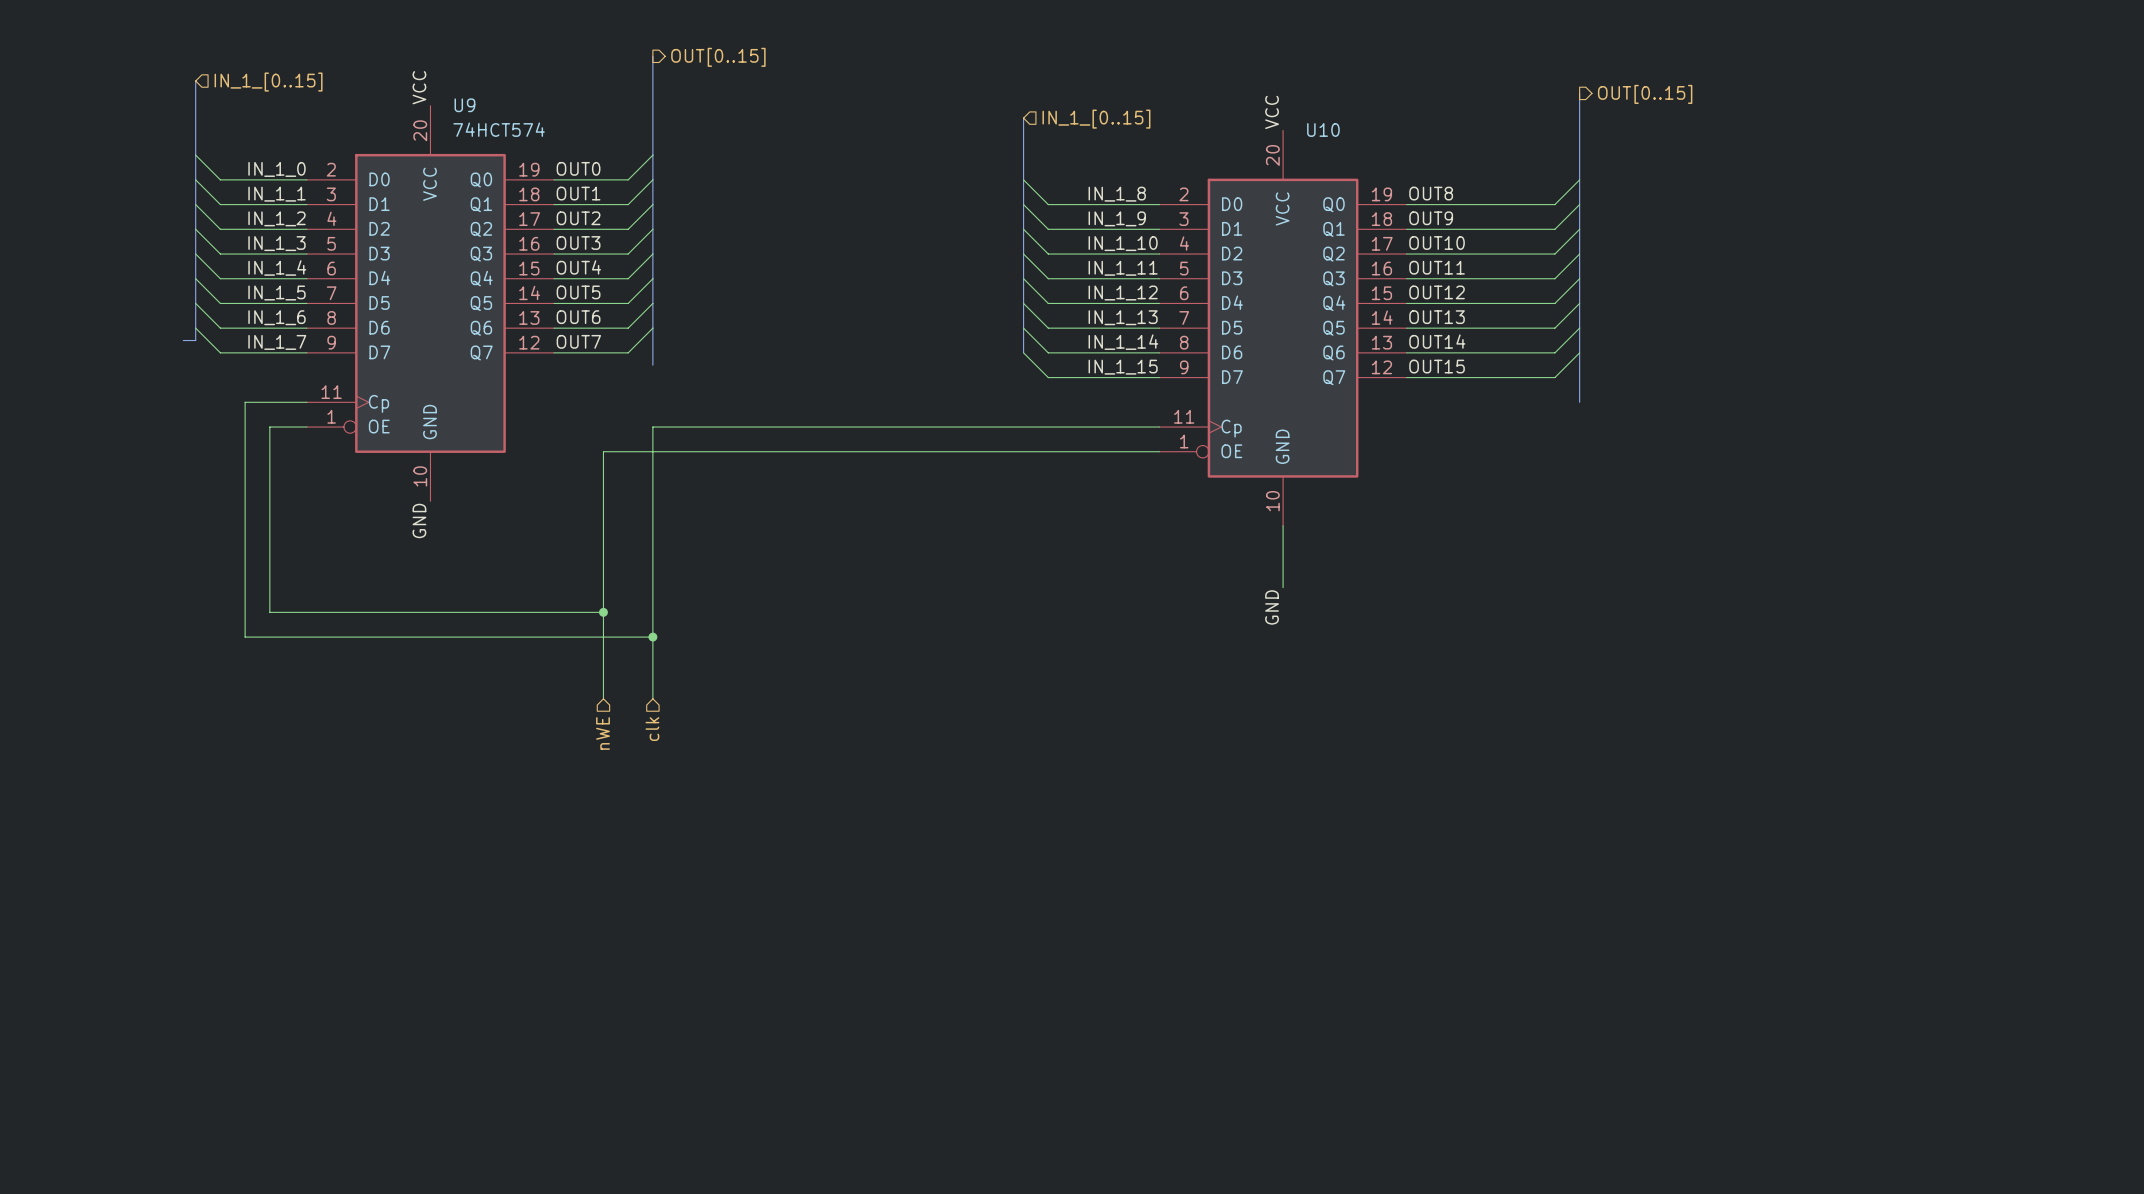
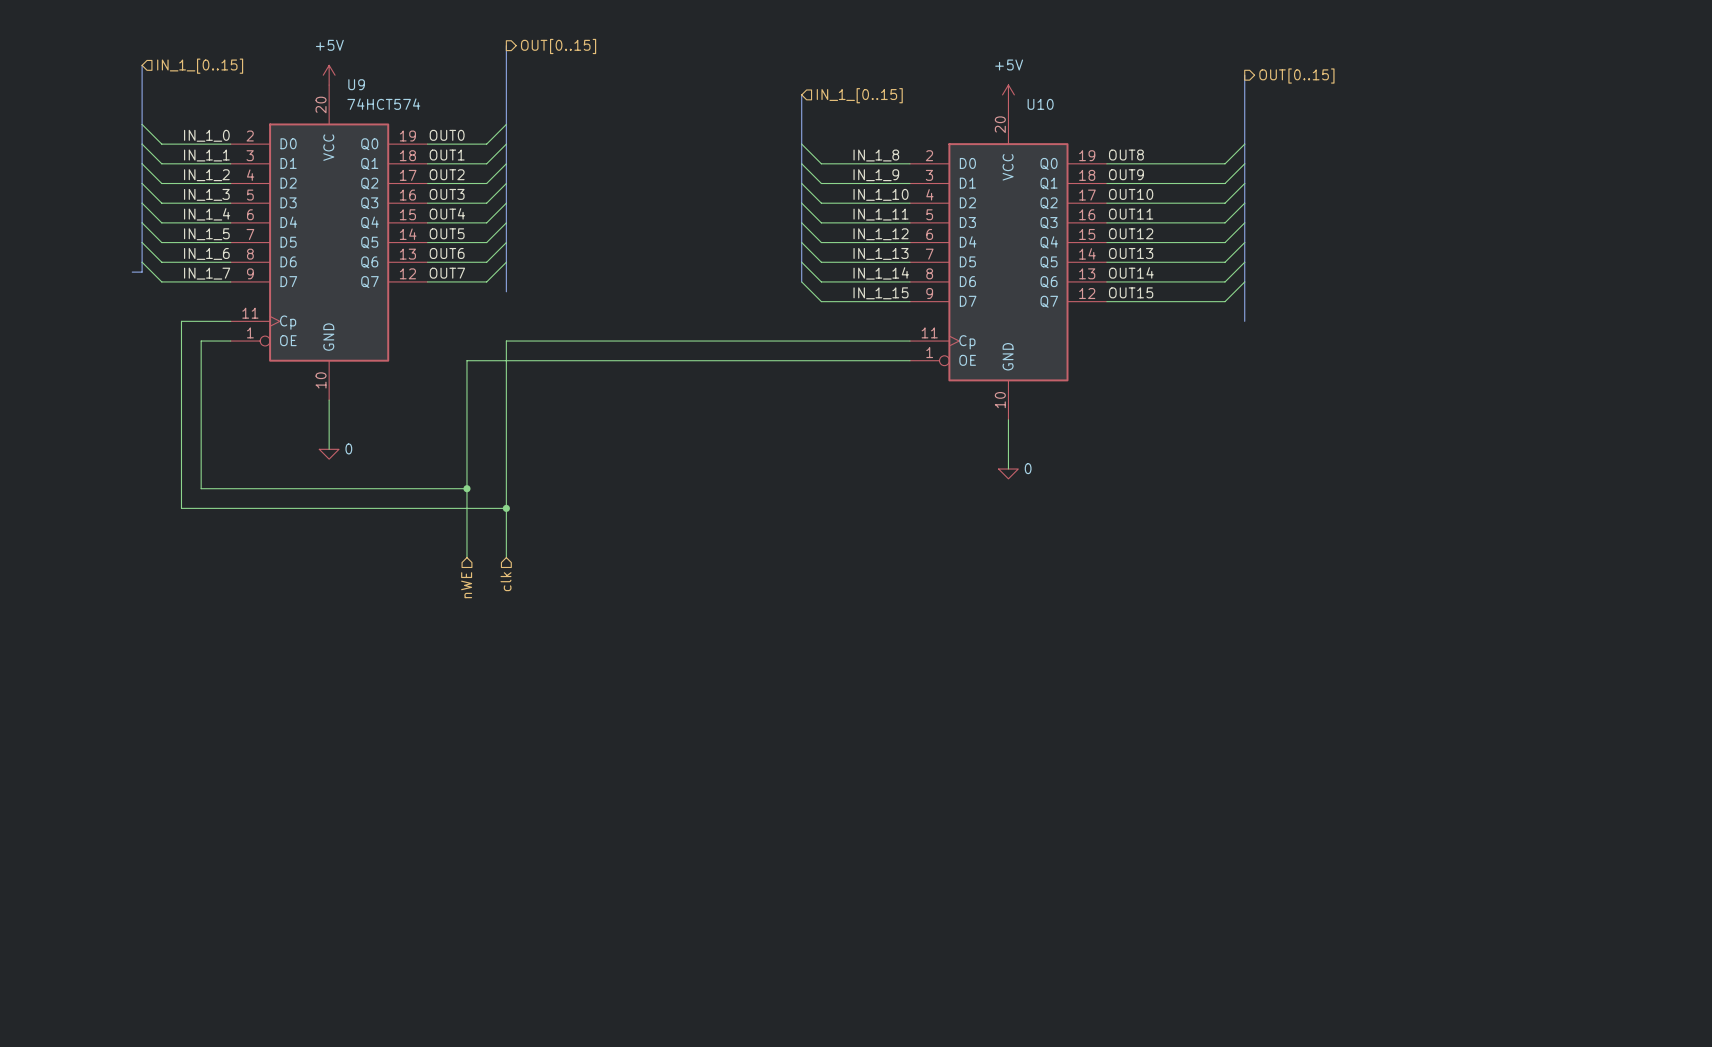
label: VCC (419, 87) -> none
power symbol: none -> +5V (329, 75)
label: VCC (1272, 112) -> none
power symbol: none -> +5V (1008, 94)
wire: none -> (329, 400) (329, 449)
label: GND (419, 520) -> none
power symbol: none -> 0 (329, 454)
power symbol: none -> 0 (1008, 473)
label: GND (1272, 607) -> none

